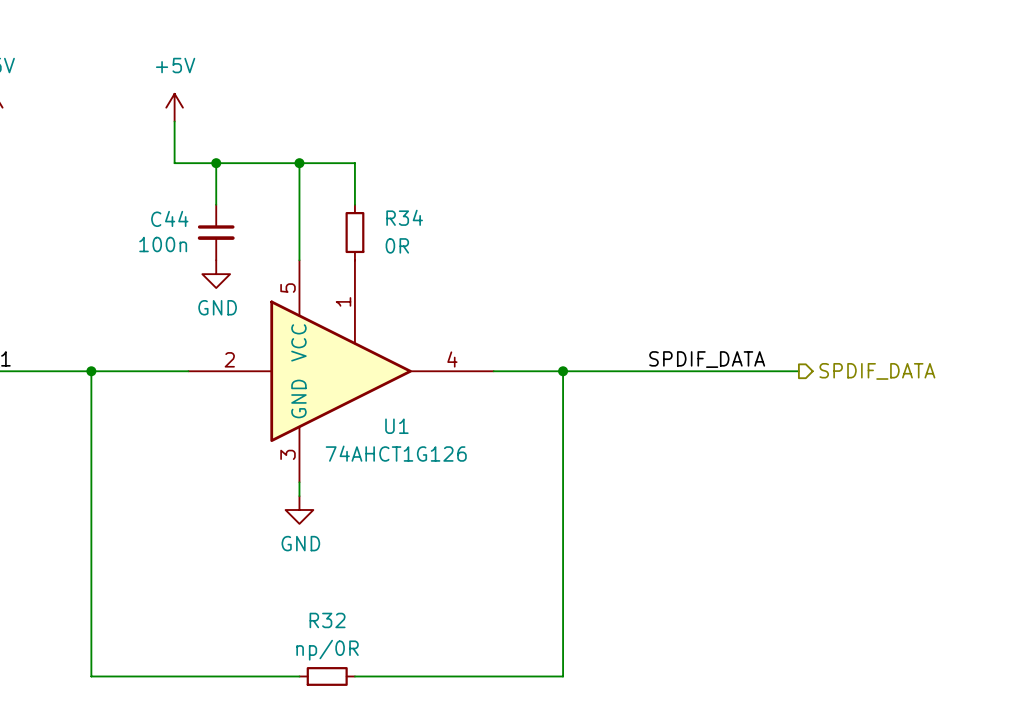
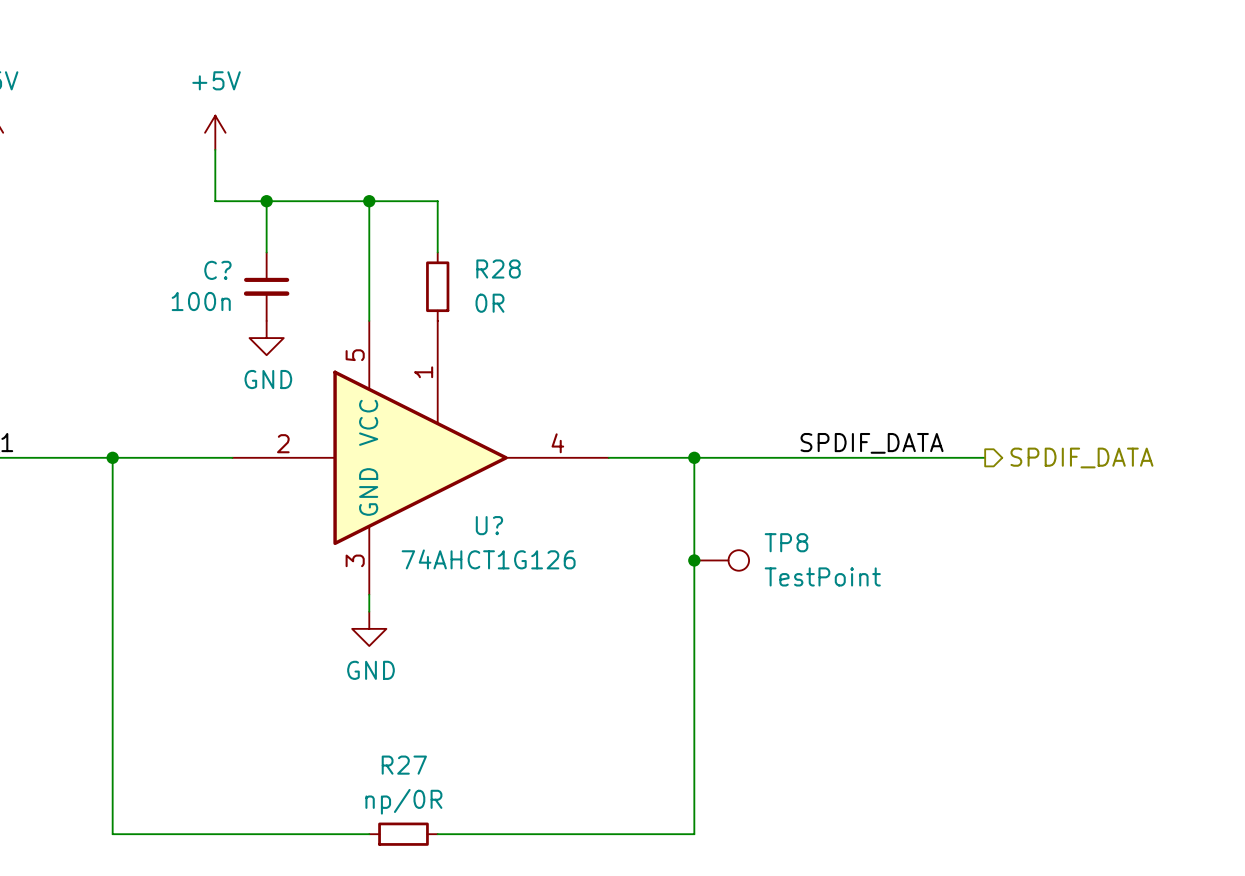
R34 name: R34 (404, 217) -> R28 (498, 269)
C44 name: C44 (169, 218) -> C? (217, 270)
U1 name: U1 (396, 426) -> U? (489, 525)
junction: none -> (694, 560)
TP8: none -> TestPoint (721, 560)
R32 name: R32 (327, 620) -> R27 (404, 765)

